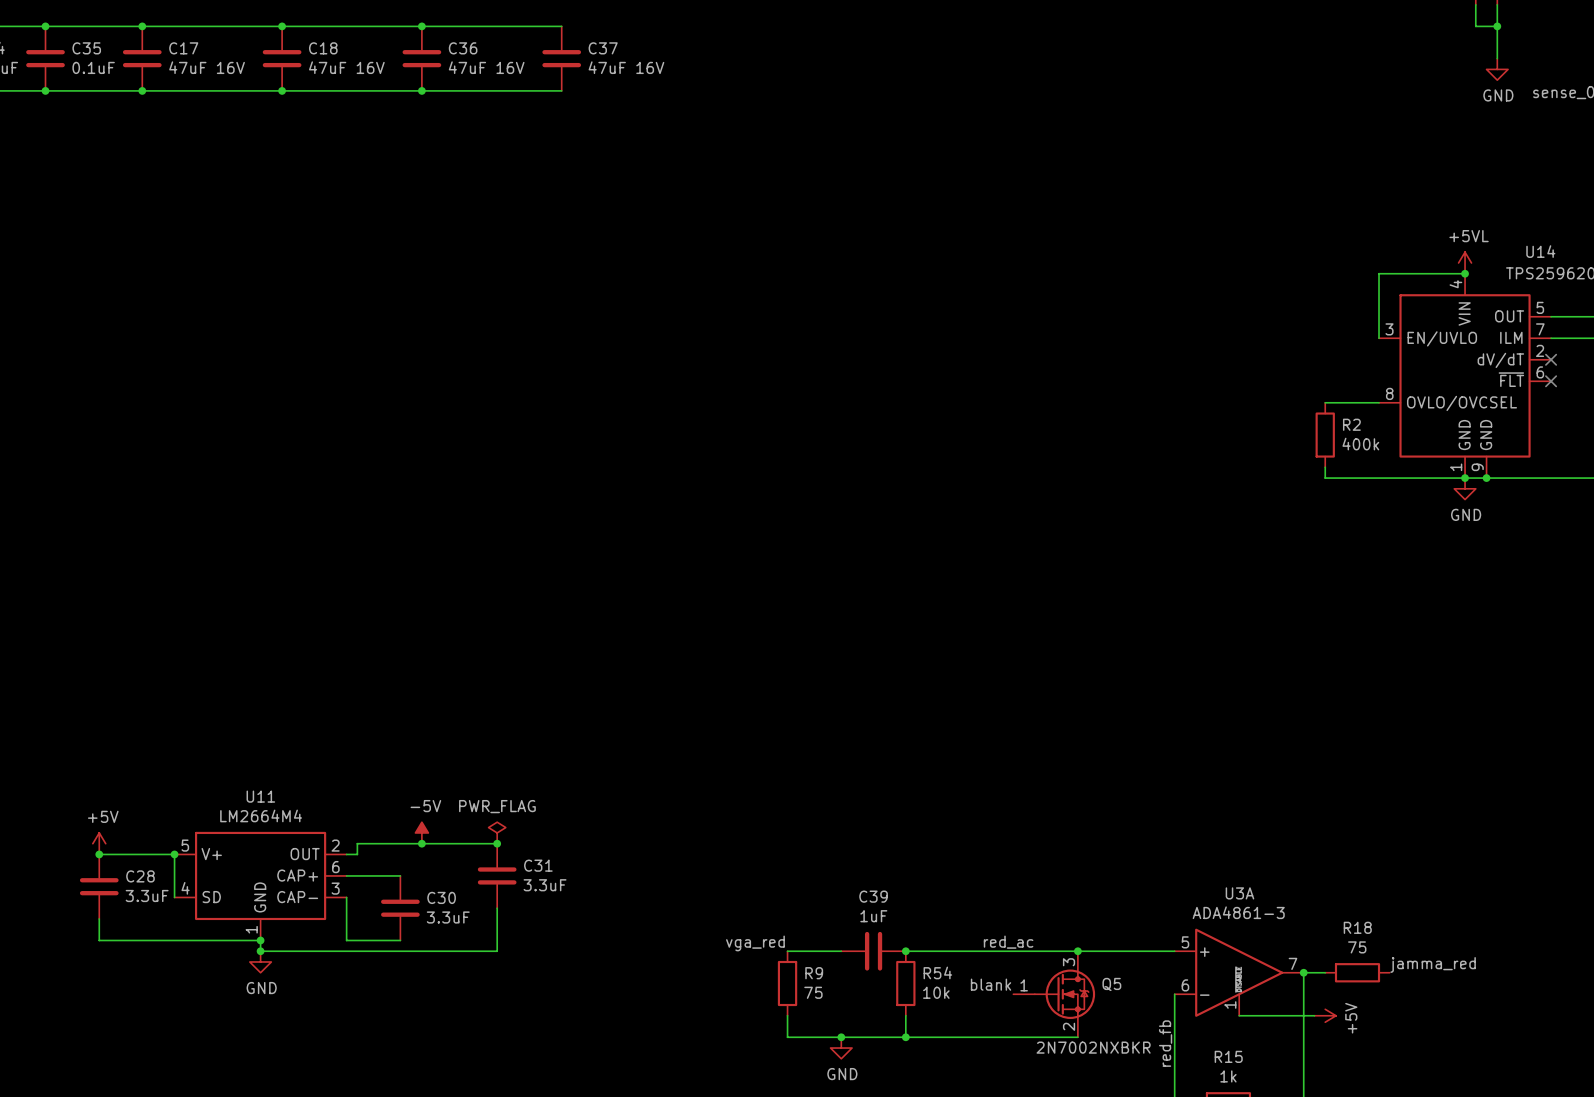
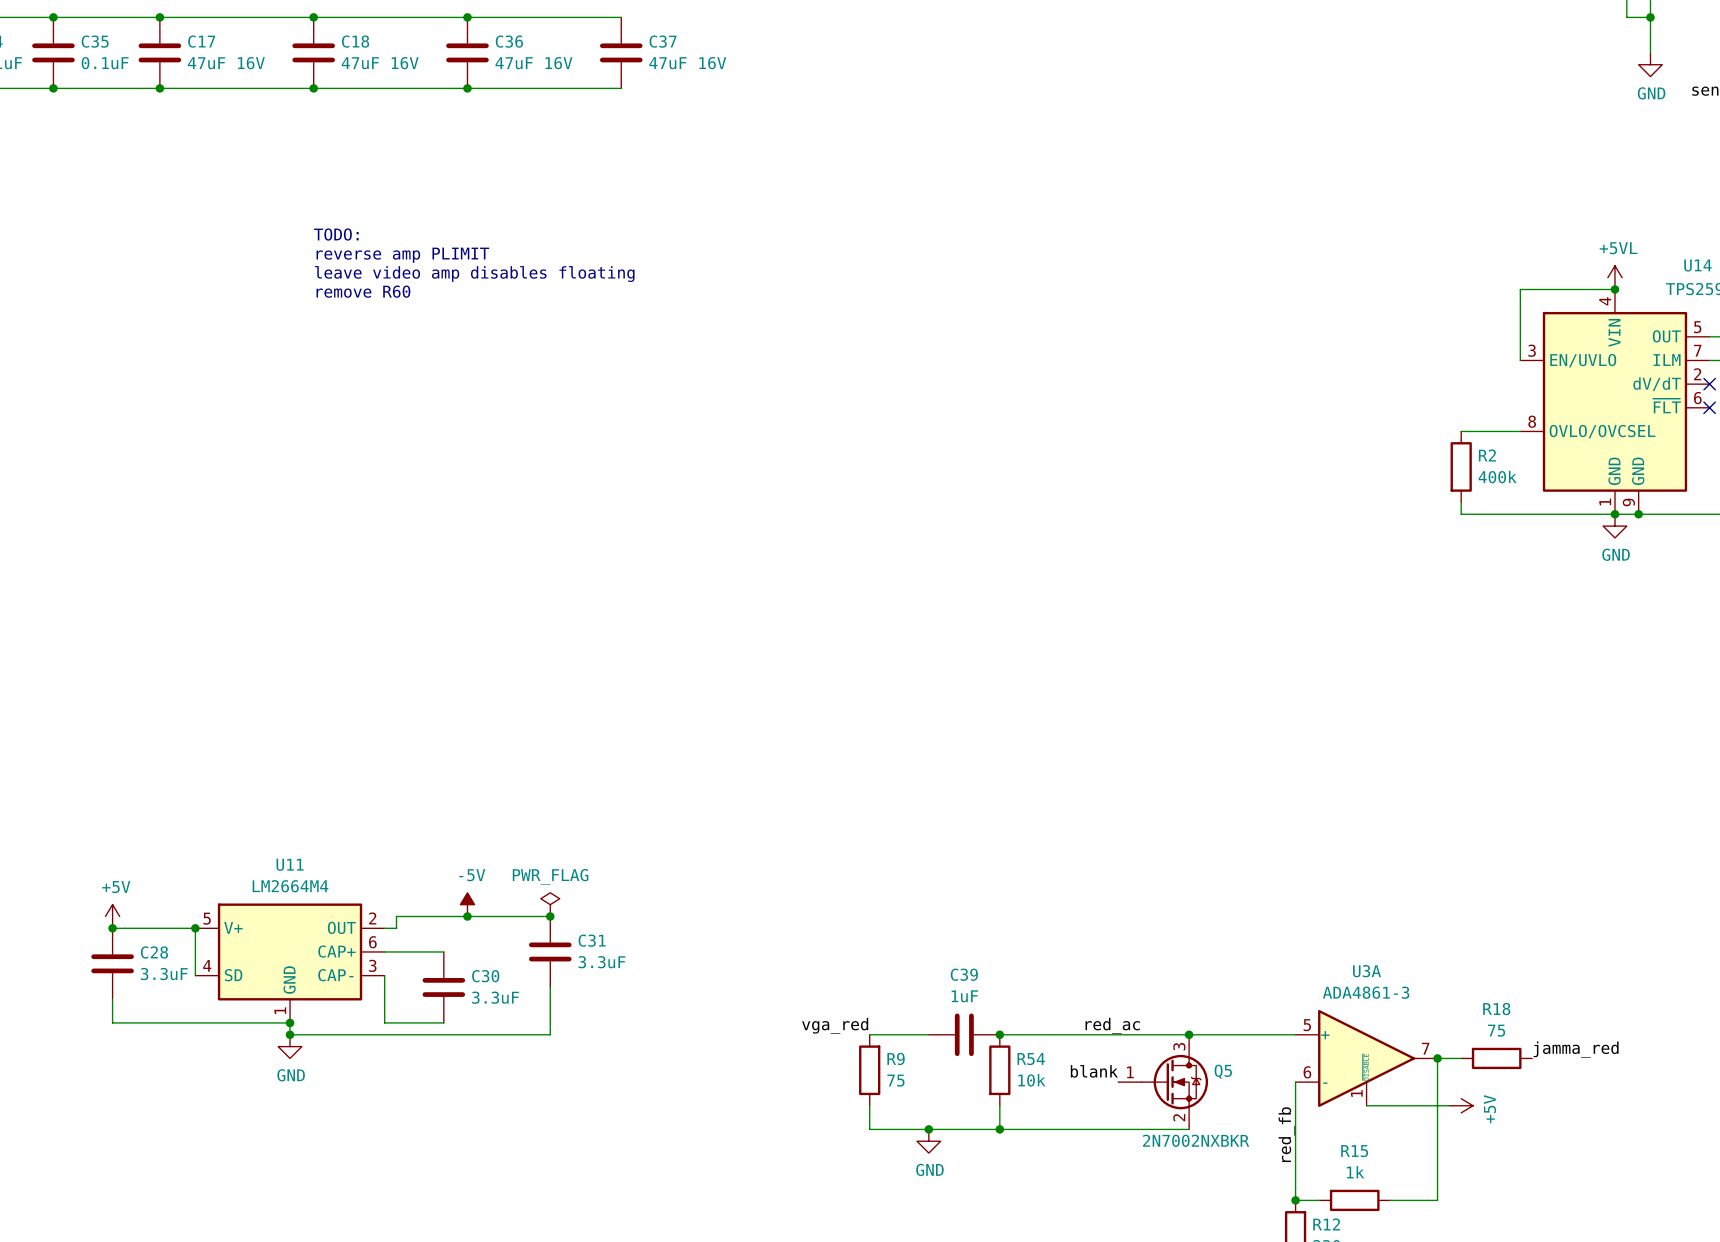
text: none -> TODO: (336, 234)
text: none -> reverse amp PLIMIT (402, 255)
text: none -> leave video amp disables floating (474, 274)
text: none -> remove R60 (363, 291)

